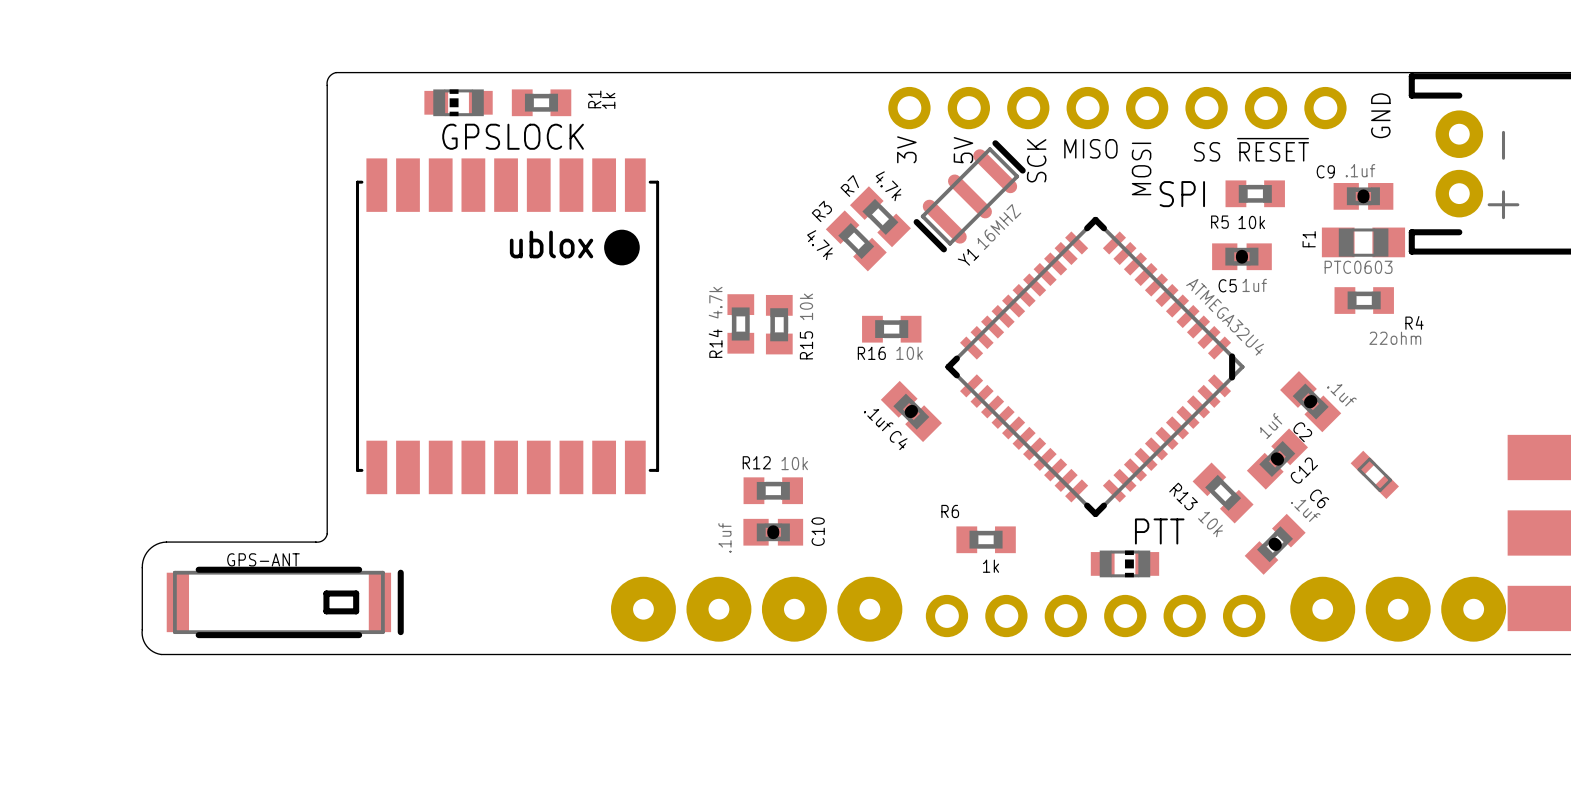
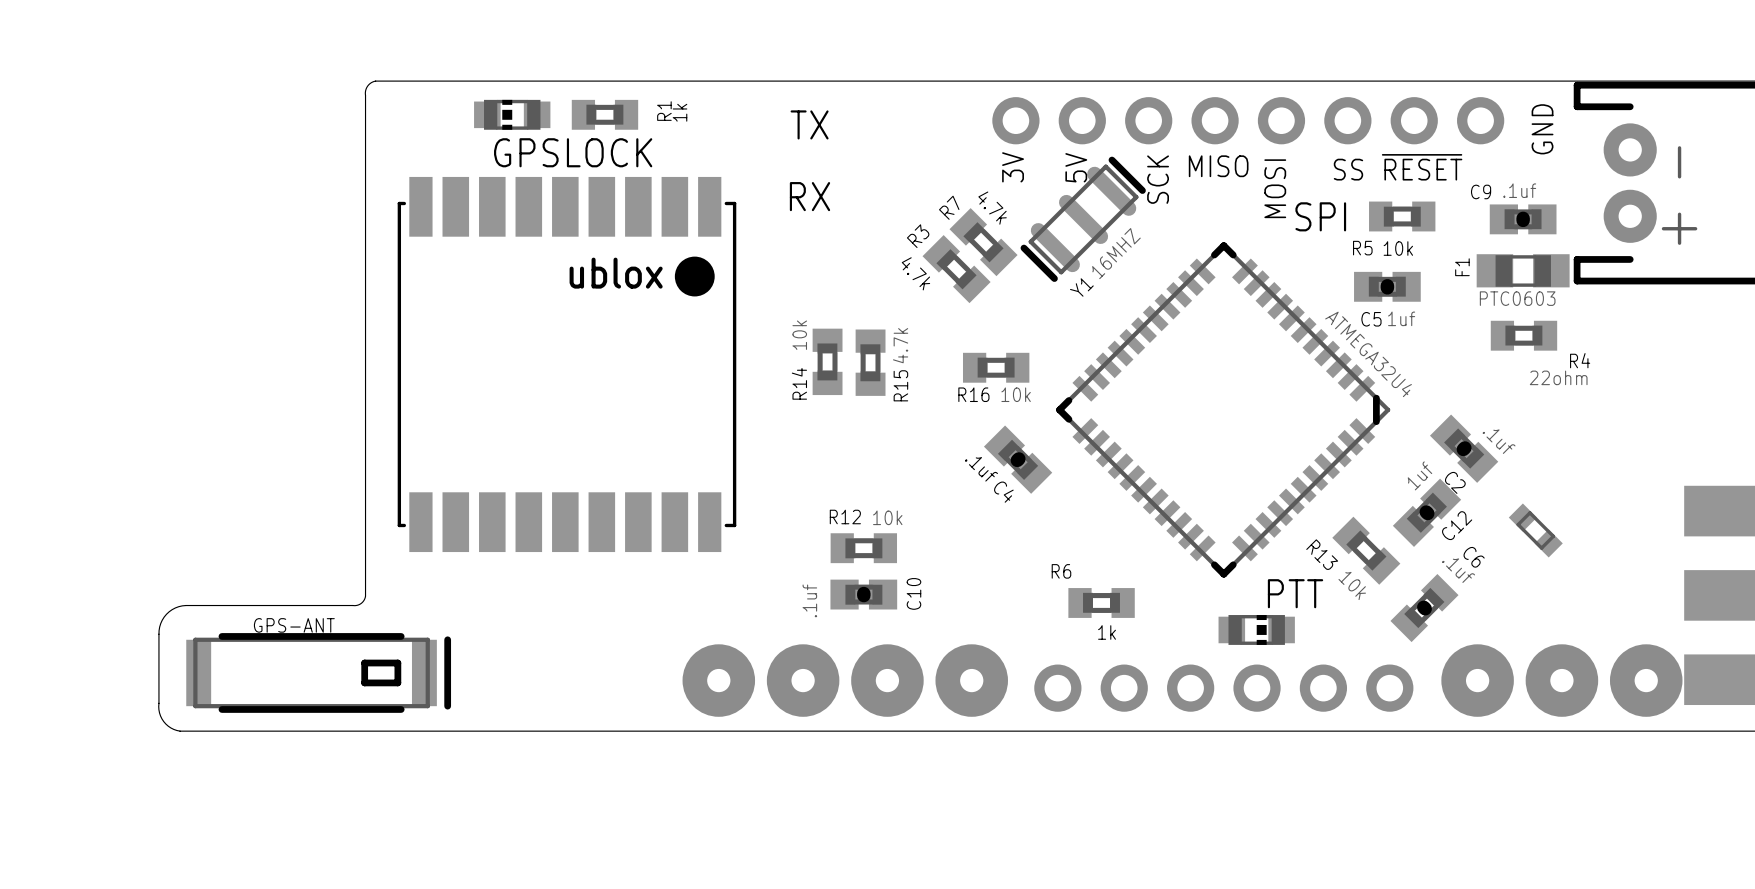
text: none -> TX (809, 124)
text: none -> RX (810, 196)
R14 value: 4.7k (715, 302) -> 10k (799, 335)
R15 value: 10k (806, 306) -> 4.7k (900, 345)

